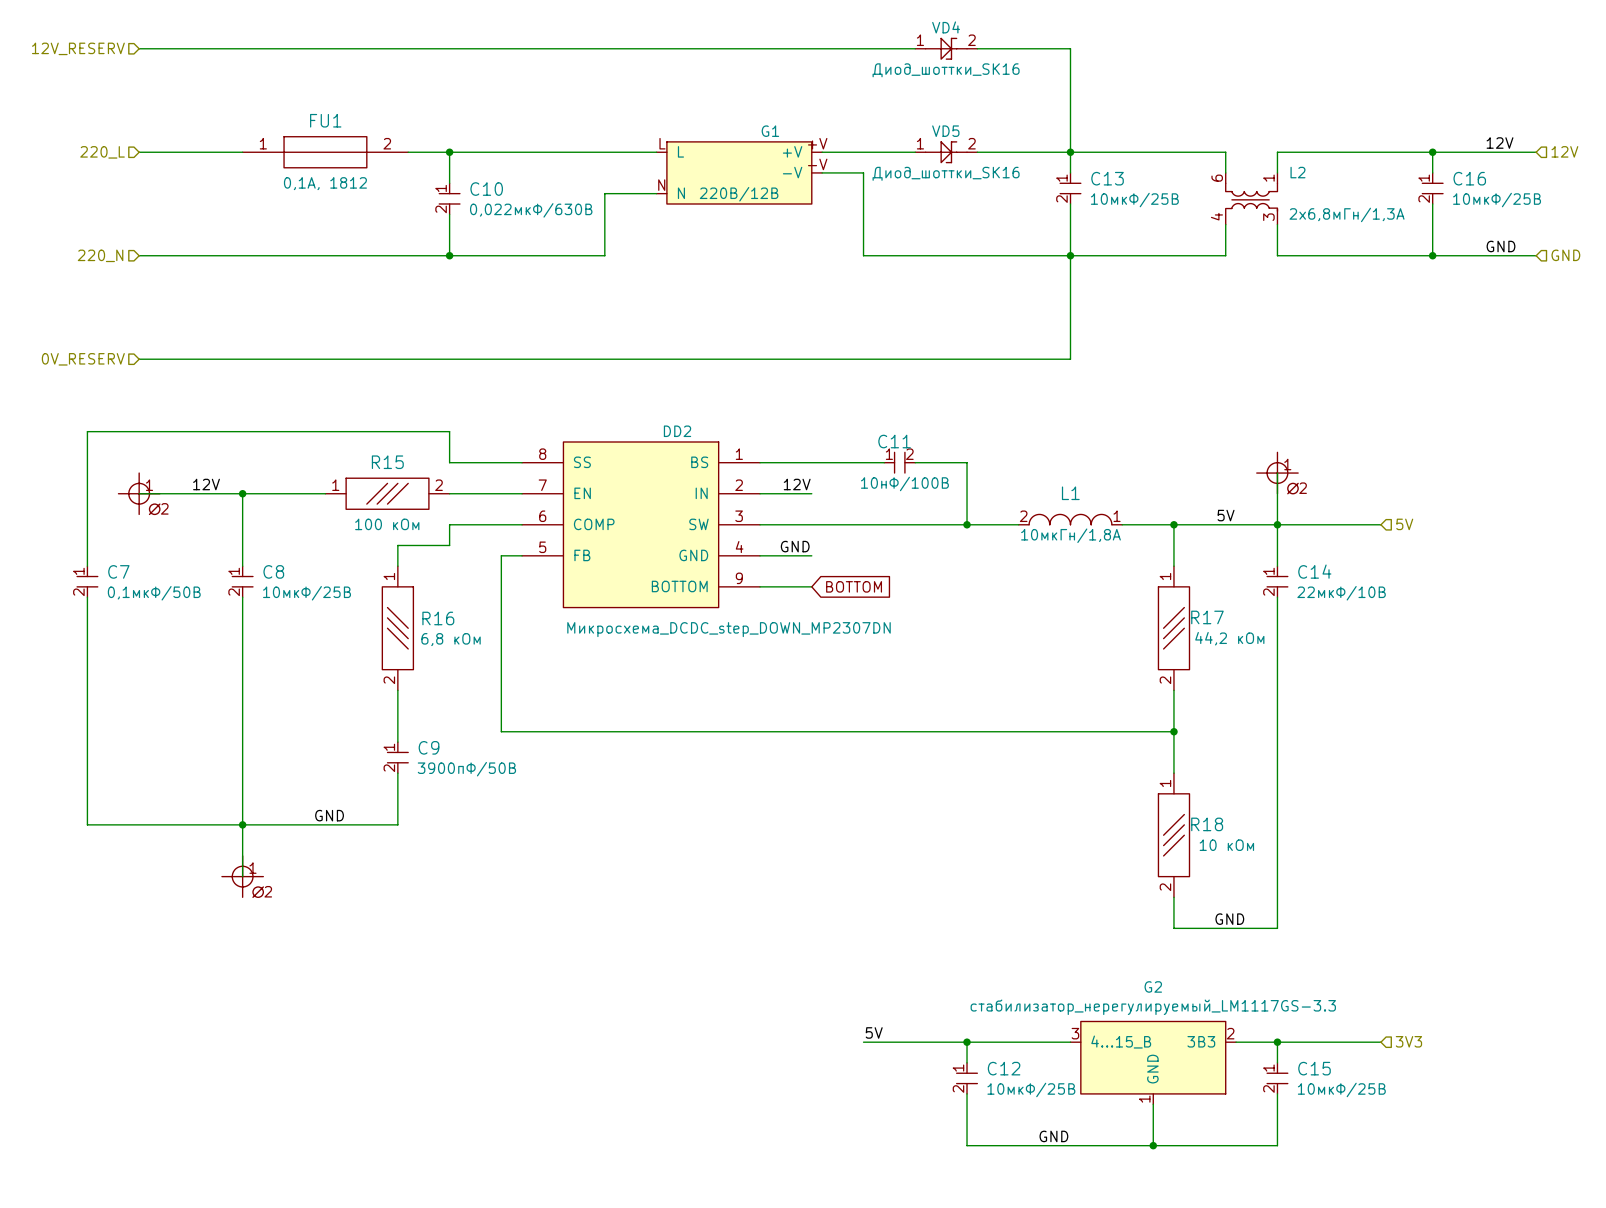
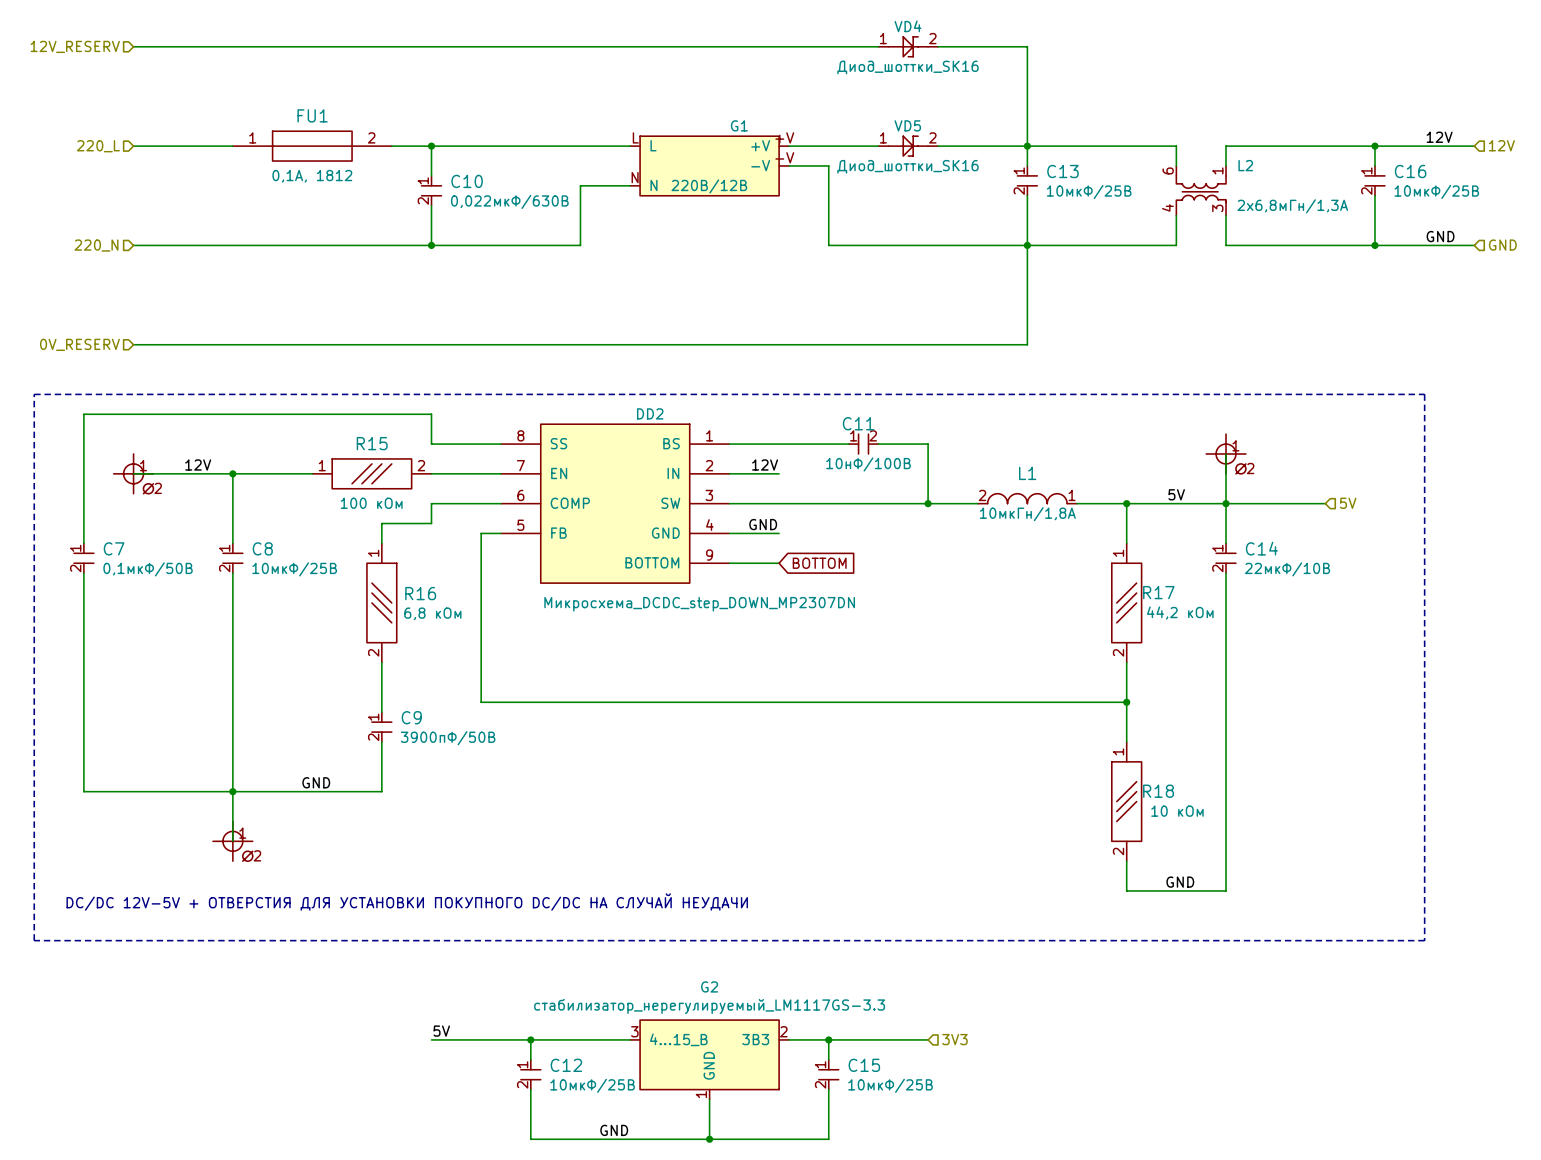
line: none -> (34, 394) (1424, 394) (1424, 940) (34, 940) (34, 394)
text: none -> DC/DC 12V-5V + ОТВЕРСТИЯ ДЛЯ УСТАНОВКИ ПОКУПНОГО DC/DC НА СЛУЧАЙ НЕУДАЧИ (407, 901)
label: 5V (874, 1032) -> none
hierarchical label: 3V3 (1408, 1041) -> none
wire: (863, 1042) (1070, 1042) -> none
wire: (967, 1042) (967, 1062) -> (828, 1039) (828, 1059)
junction: (967, 1042) -> none
wire: (1236, 1042) (1380, 1042) -> none
wire: (1277, 1042) (1277, 1062) -> none
junction: (1277, 1042) -> none
G2 position: (1153, 1062) -> (709, 1059)
label: none -> 5V (441, 1031)
C12 position: (967, 1078) -> (530, 1074)
C15 position: (1277, 1078) -> (828, 1074)
wire: none -> (431, 1039) (630, 1039)
wire: none -> (530, 1039) (530, 1059)
junction: none -> (530, 1039)
wire: none -> (789, 1039) (928, 1039)
junction: none -> (828, 1039)
hierarchical label: none -> 3V3 (954, 1039)
wire: (967, 1093) (967, 1145) (1277, 1145) (1277, 1093) -> none
wire: (1153, 1104) (1153, 1145) -> none
wire: none -> (530, 1089) (530, 1139) (828, 1139) (828, 1089)
label: GND (1053, 1136) -> none
wire: none -> (709, 1099) (709, 1139)
junction: (1153, 1145) -> none
label: none -> GND (614, 1130)
junction: none -> (709, 1139)

